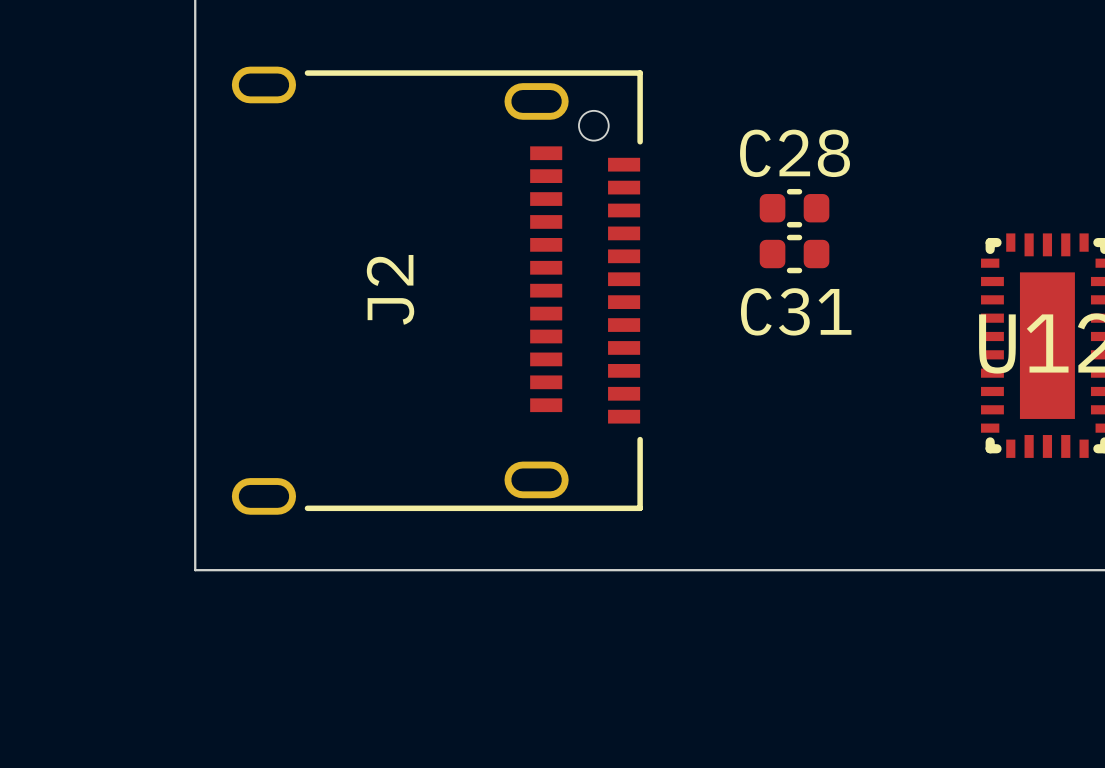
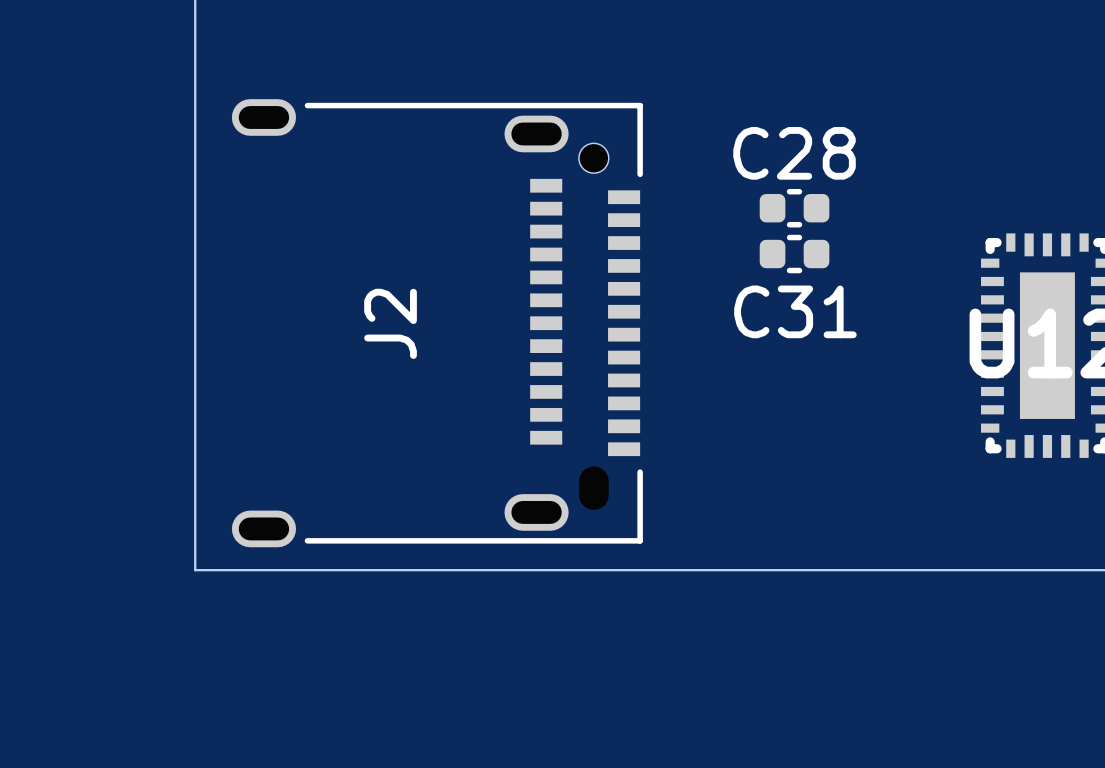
J2 position: (437, 290) -> (437, 323)

